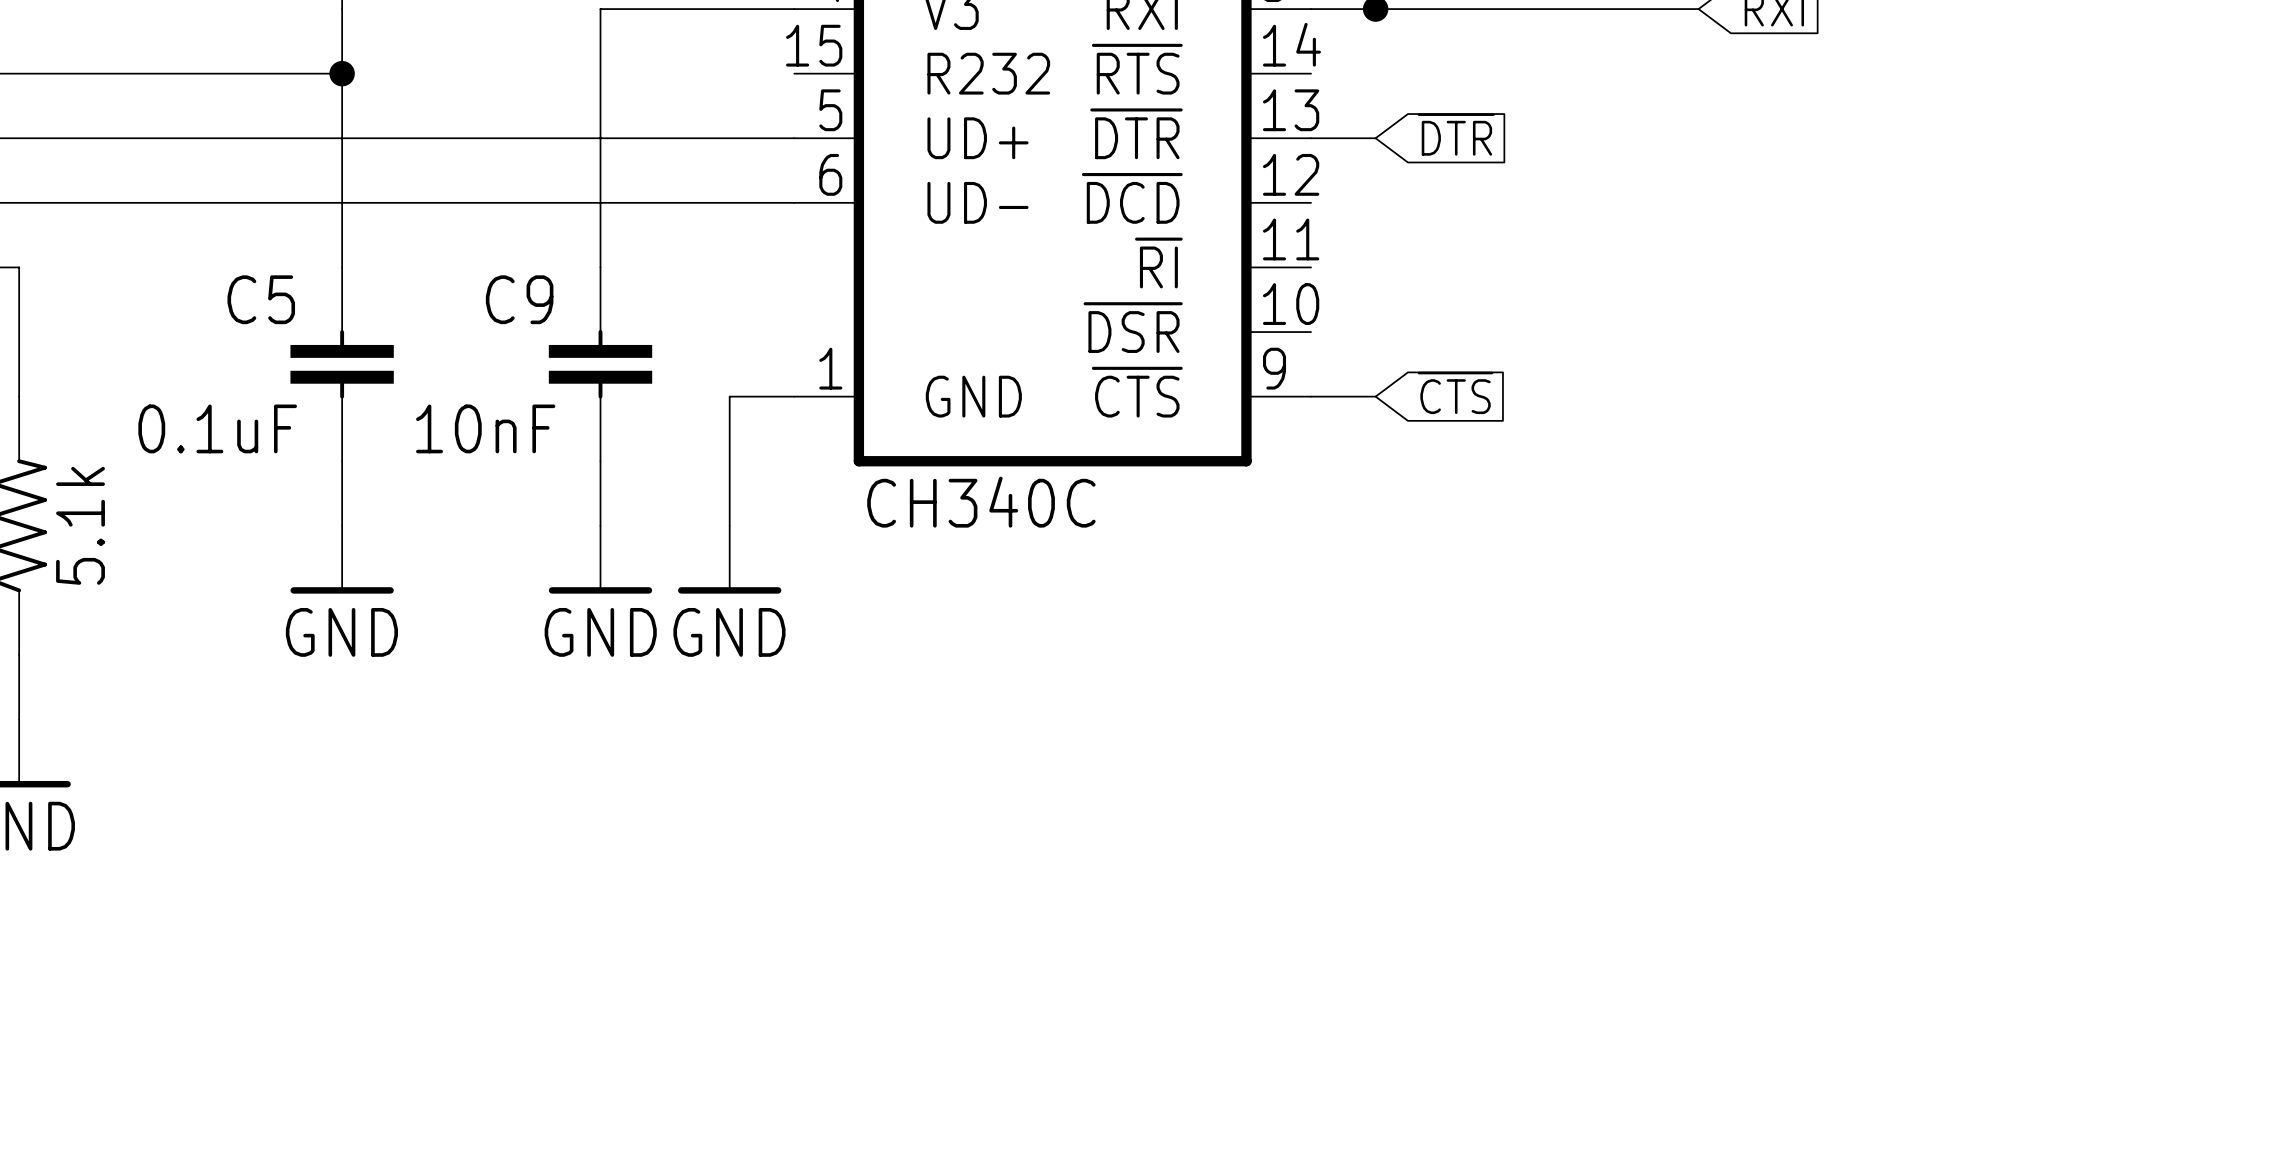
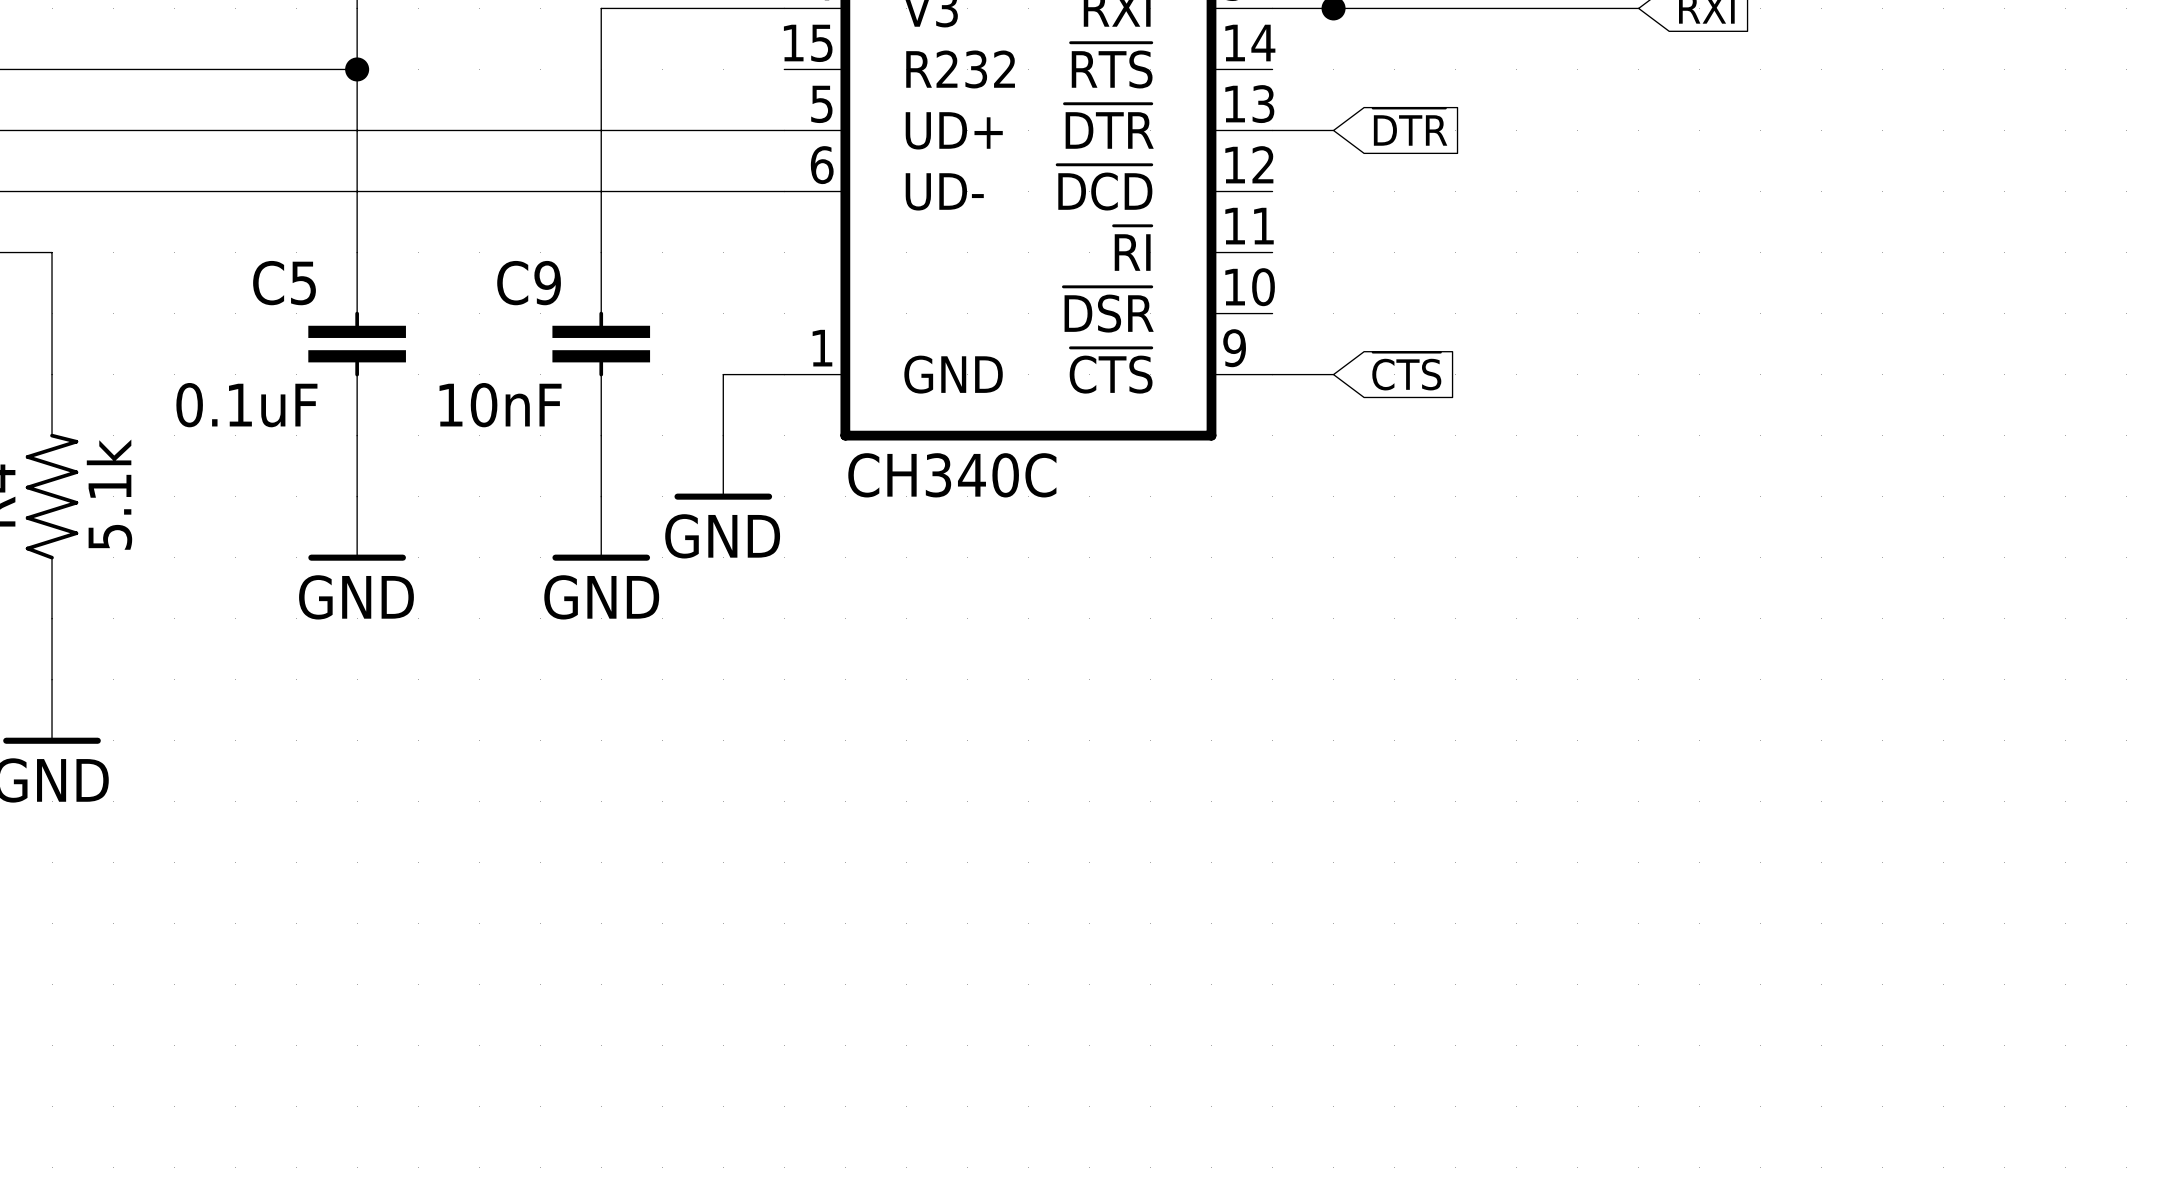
power symbol position: GND (729, 559) -> GND (723, 467)

